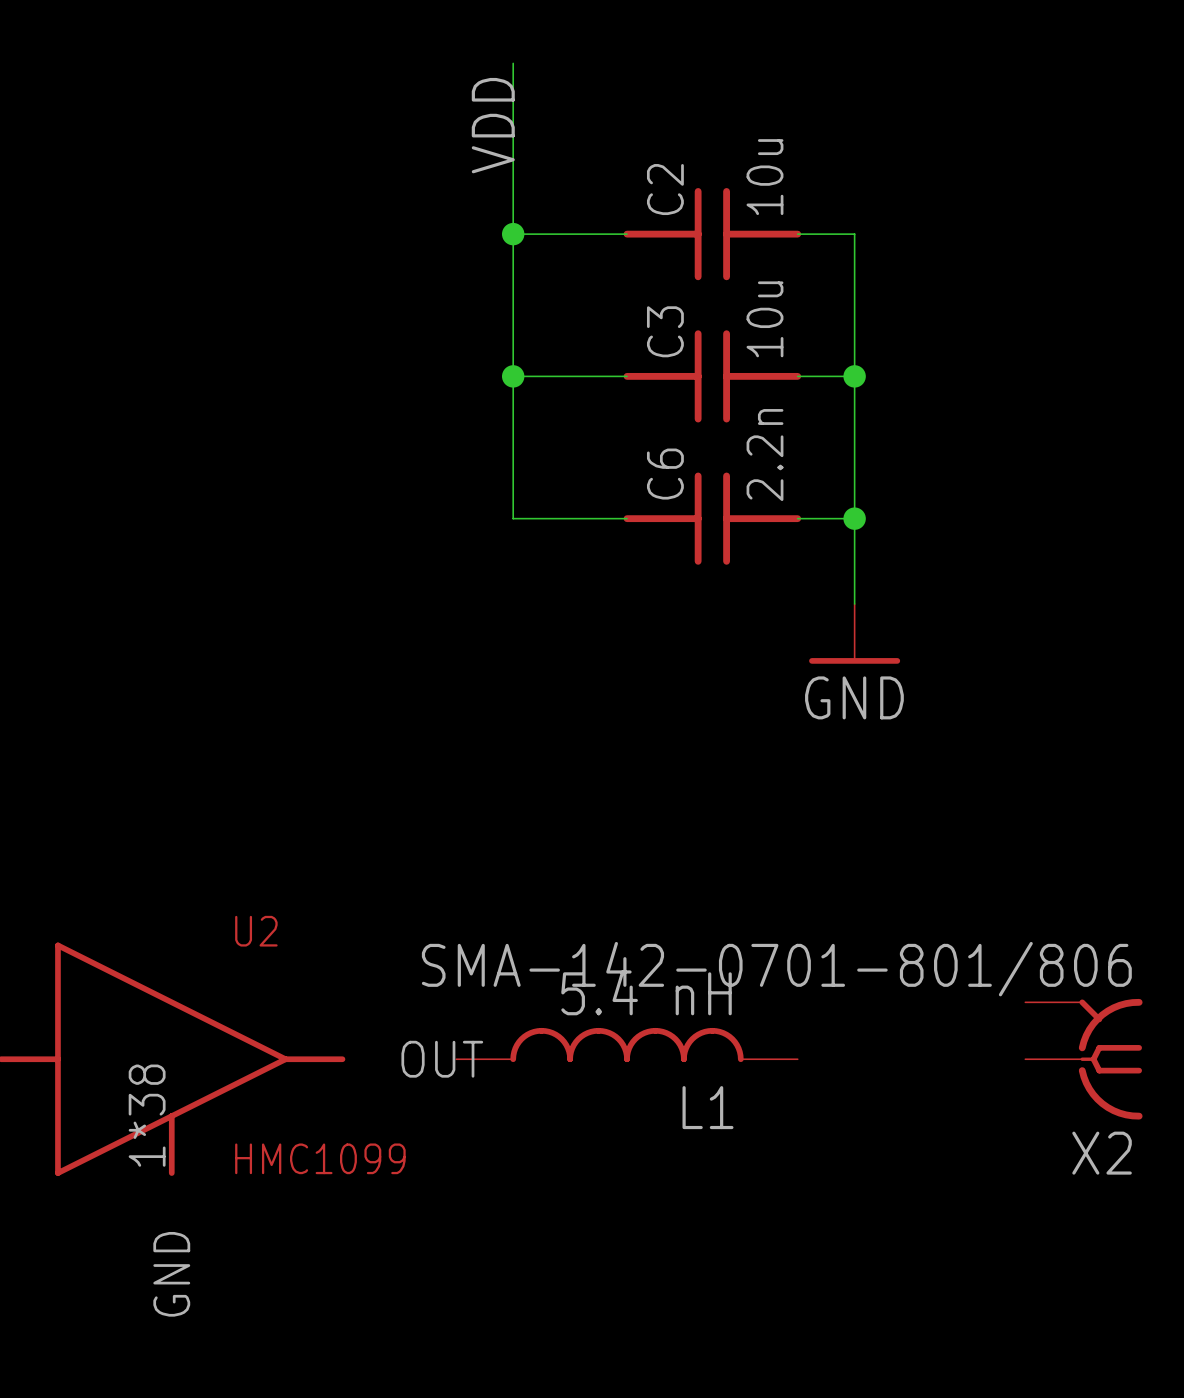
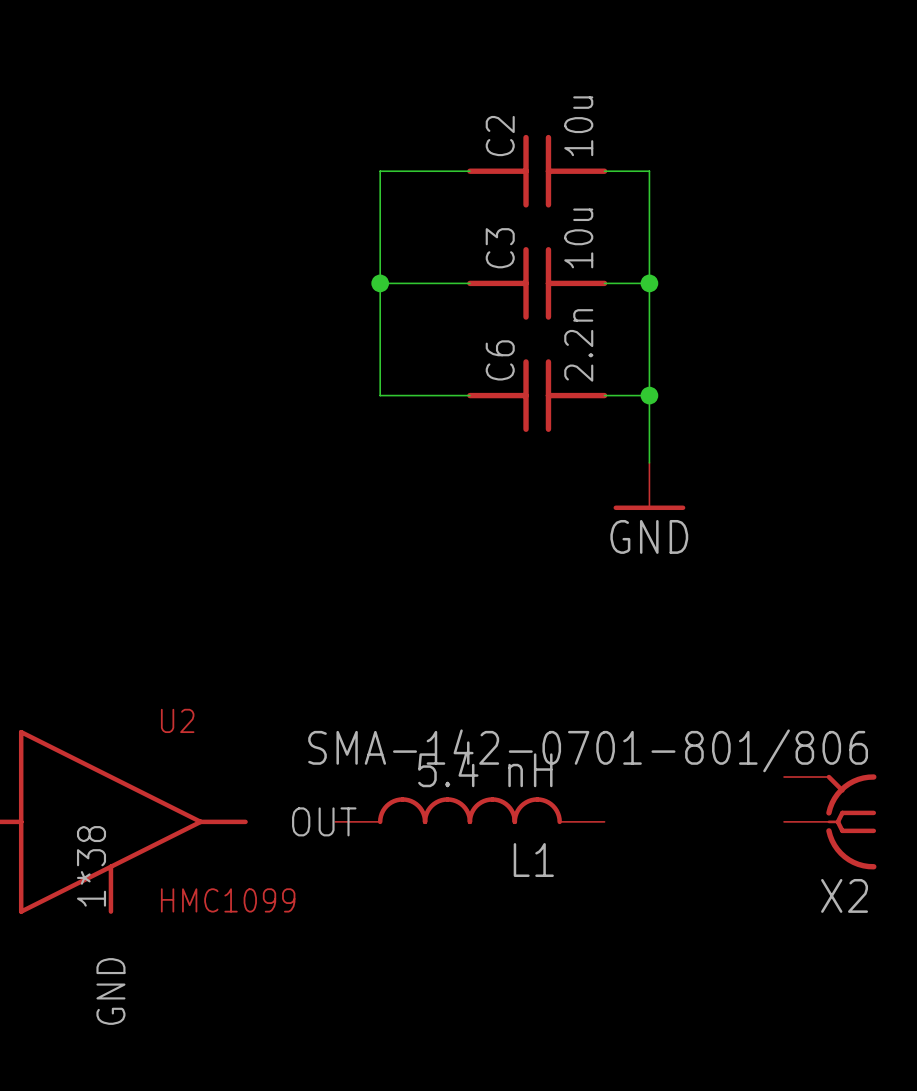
wire: (513, 63) (513, 234) -> none
label: VDD (493, 125) -> none
junction: (513, 234) -> none

